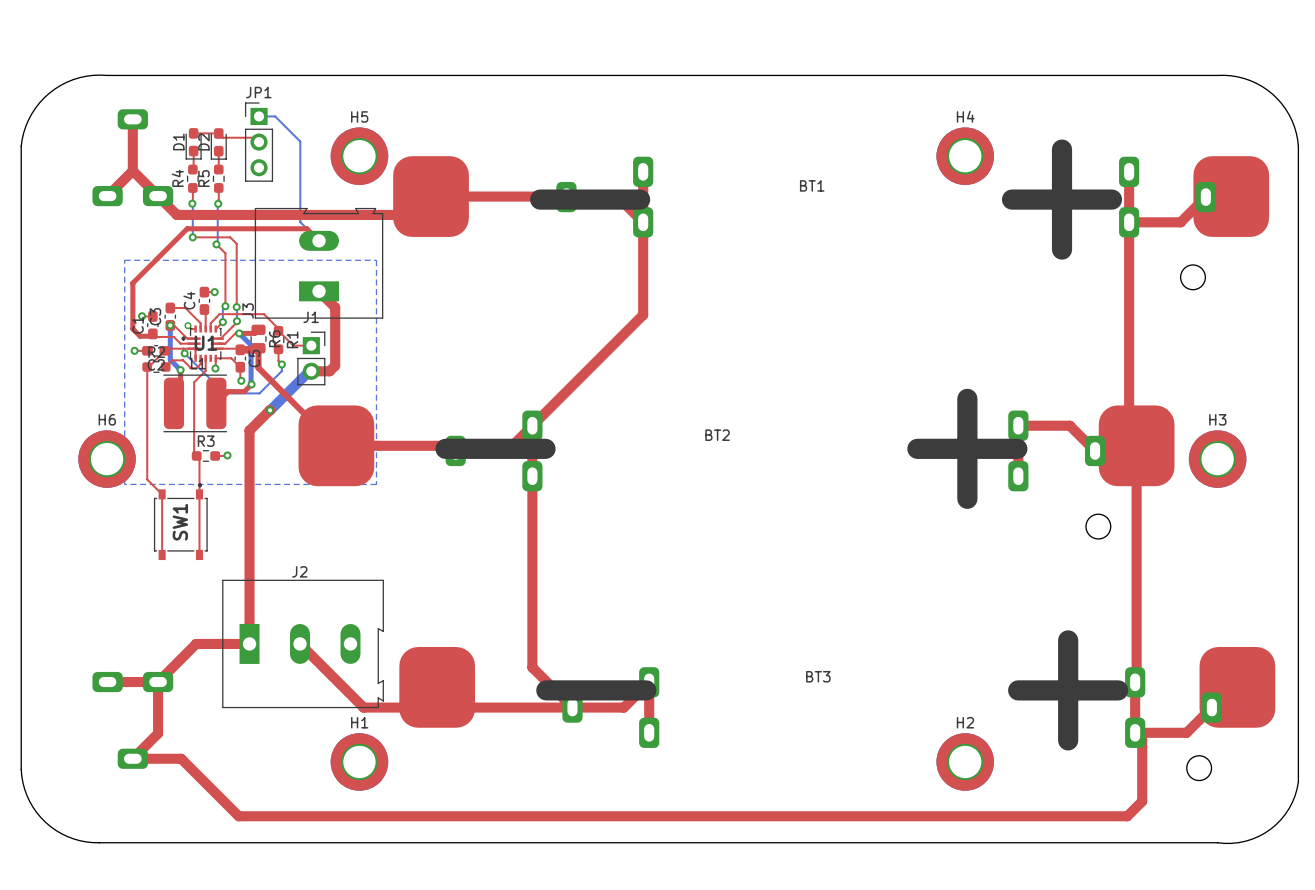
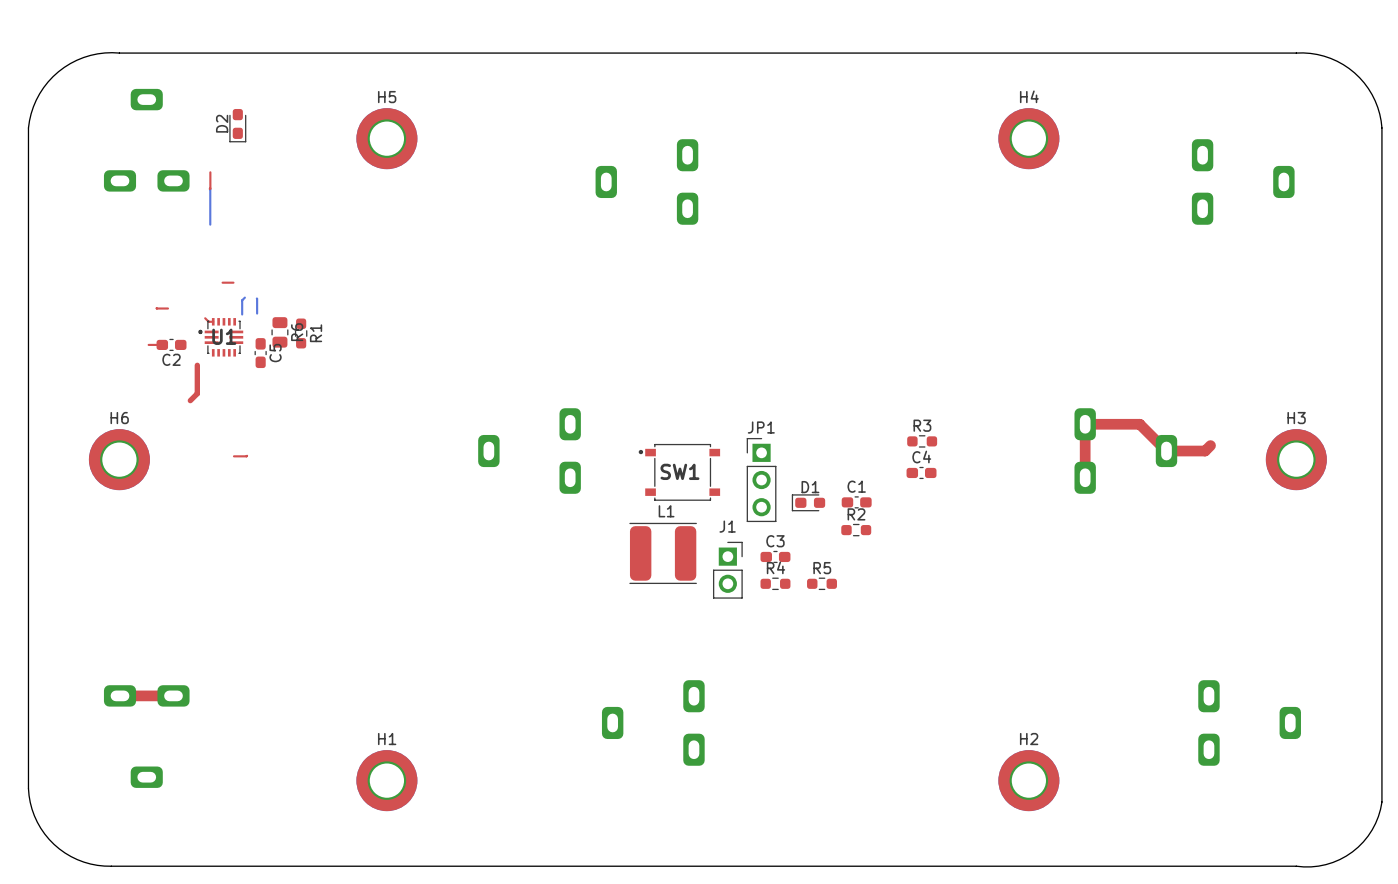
bottom track: (259, 116) (275, 116) (300, 141) (300, 222) (319, 240) -> none
top track: (132, 119) (132, 170) -> none
top track: (193, 133) (218, 133) (222, 137) (254, 137) (259, 142) -> none
JP1 position: (259, 142) -> (761, 480)
D1 rotation: 0° (193, 143) -> 90° clockwise (808, 502)
D1 position: (193, 143) -> (808, 502)
top track: (193, 151) (192, 169) -> none
top track: (218, 151) (218, 169) -> none
top track: (132, 170) (107, 196) -> none
top track: (132, 170) (176, 214) (412, 214) (431, 196) (617, 197) (643, 222) -> none
top track: (643, 171) (643, 314) (507, 450) (455, 450) (450, 445) (336, 445) (258, 367) (258, 348) (256, 349) (217, 348) -> none
top track: (1129, 171) (1129, 438) (1136, 445) (1135, 732) -> none
R4 rotation: 0° (192, 178) -> 90° clockwise (775, 583)
R4 position: (192, 178) -> (775, 583)
R5 rotation: 0° (218, 178) -> 90° clockwise (822, 583)
R5 position: (218, 178) -> (822, 583)
top track: (218, 187) (218, 203) -> none
top track: (1205, 197) (1180, 222) (1129, 222) -> none
via: (192, 203) -> none
bottom track: (218, 203) (216, 244) -> none
via: (218, 203) -> none
BT1: (831, 222) -> none
top track: (192, 237) (230, 237) (236, 243) (236, 307) -> none
via: (192, 237) -> none
top track: (319, 240) (306, 228) (187, 228) (132, 283) (132, 329) (140, 336) (150, 336) (152, 333) (155, 336) (173, 336) (180, 343) (194, 343) -> none
top track: (216, 244) (225, 253) (225, 306) -> none
via: (216, 244) -> none
bottom zone outline: (124, 260) (124, 484) (376, 484) (376, 260) (124, 260) -> none
J3: (319, 263) -> none
top track: (319, 291) (335, 307) (335, 365) (329, 371) (311, 371) -> none
via: (214, 292) -> none
C4 rotation: 0° (204, 300) -> 90° clockwise (921, 472)
C4 position: (204, 300) -> (921, 472)
via: (225, 306) -> none
via: (236, 307) -> none
top track: (170, 308) (185, 308) (200, 323) (200, 329) -> none
top track: (204, 309) (205, 329) -> none
via: (142, 316) -> none
C3 rotation: 0° (170, 316) -> 90° clockwise (775, 556)
C3 position: (170, 316) -> (775, 556)
top track: (236, 321) (220, 338) (217, 338) -> none
via: (236, 321) -> none
top track: (222, 322) (215, 329) -> none
via: (222, 322) -> none
C1 rotation: 0° (152, 325) -> 90° clockwise (856, 502)
C1 position: (152, 325) -> (856, 502)
top track: (170, 325) (174, 325) (187, 338) (194, 338) -> none
bottom track: (170, 325) (170, 359) (180, 370) -> none
via: (170, 325) -> none
via: (187, 325) -> none
top track: (210, 329) (210, 323) (219, 314) (263, 314) (293, 345) (311, 345) -> none
top track: (239, 333) (254, 333) (258, 329) (255, 332) (236, 332) (225, 343) (217, 343) -> none
bottom track: (239, 333) (251, 345) (251, 384) -> none
via: (239, 333) -> none
top track: (278, 349) (278, 361) (281, 364) -> none
via: (134, 350) -> none
bottom track: (184, 353) (224, 393) (259, 393) (281, 371) (281, 364) -> none
via: (184, 353) -> none
top track: (195, 358) (194, 348) (167, 348) (147, 366) (147, 479) (162, 494) (162, 554) -> none
top track: (200, 358) (200, 364) (196, 368) (190, 368) (183, 360) (172, 360) (165, 366) -> none
top track: (205, 358) (205, 370) (194, 382) (194, 453) (199, 458) (199, 554) -> none
J1 position: (311, 358) -> (727, 570)
via: (281, 364) -> none
R2 position: (156, 366) -> (856, 530)
top track: (215, 368) (215, 358) (231, 358) (240, 367) (241, 380) -> none
via: (215, 368) -> none
via: (180, 370) -> none
bottom track: (311, 371) (270, 410) -> none
via: (241, 380) -> none
top track: (251, 384) (244, 391) (228, 391) (216, 403) -> none
via: (251, 384) -> none
L1 position: (195, 403) -> (663, 553)
top track: (270, 410) (249, 430) (249, 643) (196, 643) (158, 682) (158, 733) (132, 758) (181, 758) (238, 816) (1127, 816) (1142, 801) (1142, 739) (1135, 732) -> none
via: (270, 410) -> none
top track: (532, 425) (532, 667) (572, 707) -> none
R3 position: (205, 455) -> (922, 441)
via: (227, 455) -> none
BT2: (736, 472) -> none
SW1 rotation: 0° (180, 521) -> 90° counterclockwise (679, 472)
SW1 position: (180, 521) -> (679, 472)
top track: (300, 643) (363, 707) (623, 707) (649, 682) (649, 732) -> none
J2: (303, 643) -> none
top track: (1211, 707) (1186, 732) (1135, 732) -> none
BT3: (837, 713) -> none

